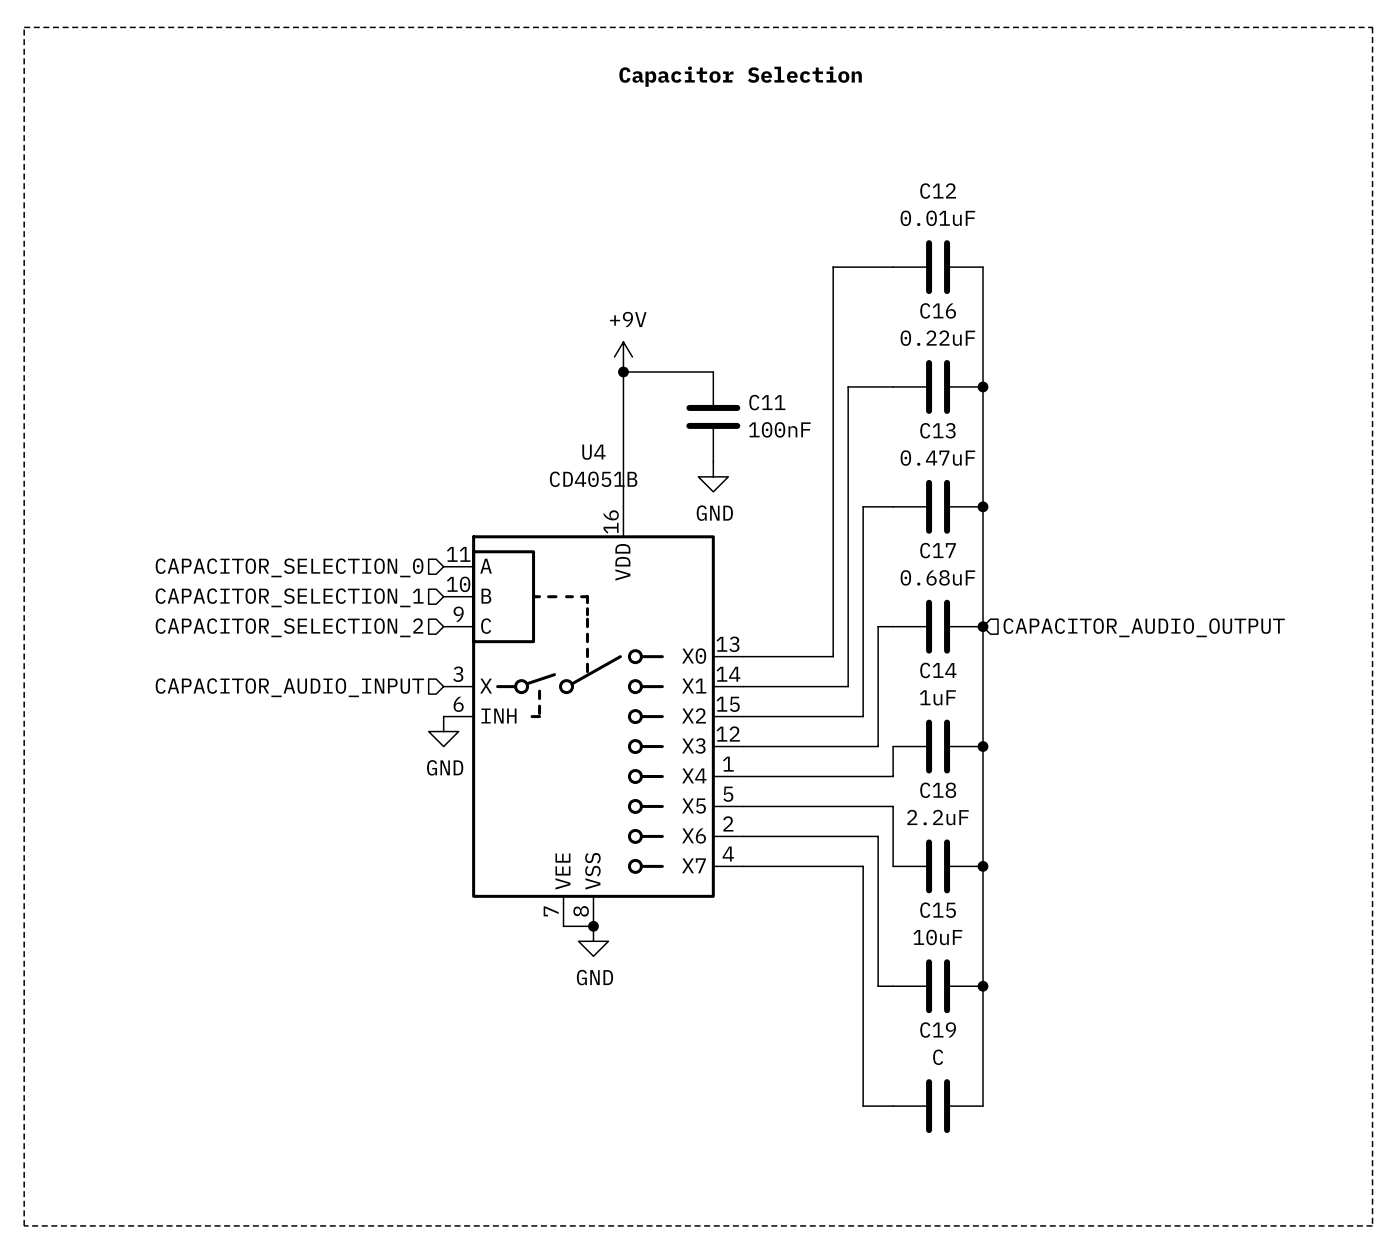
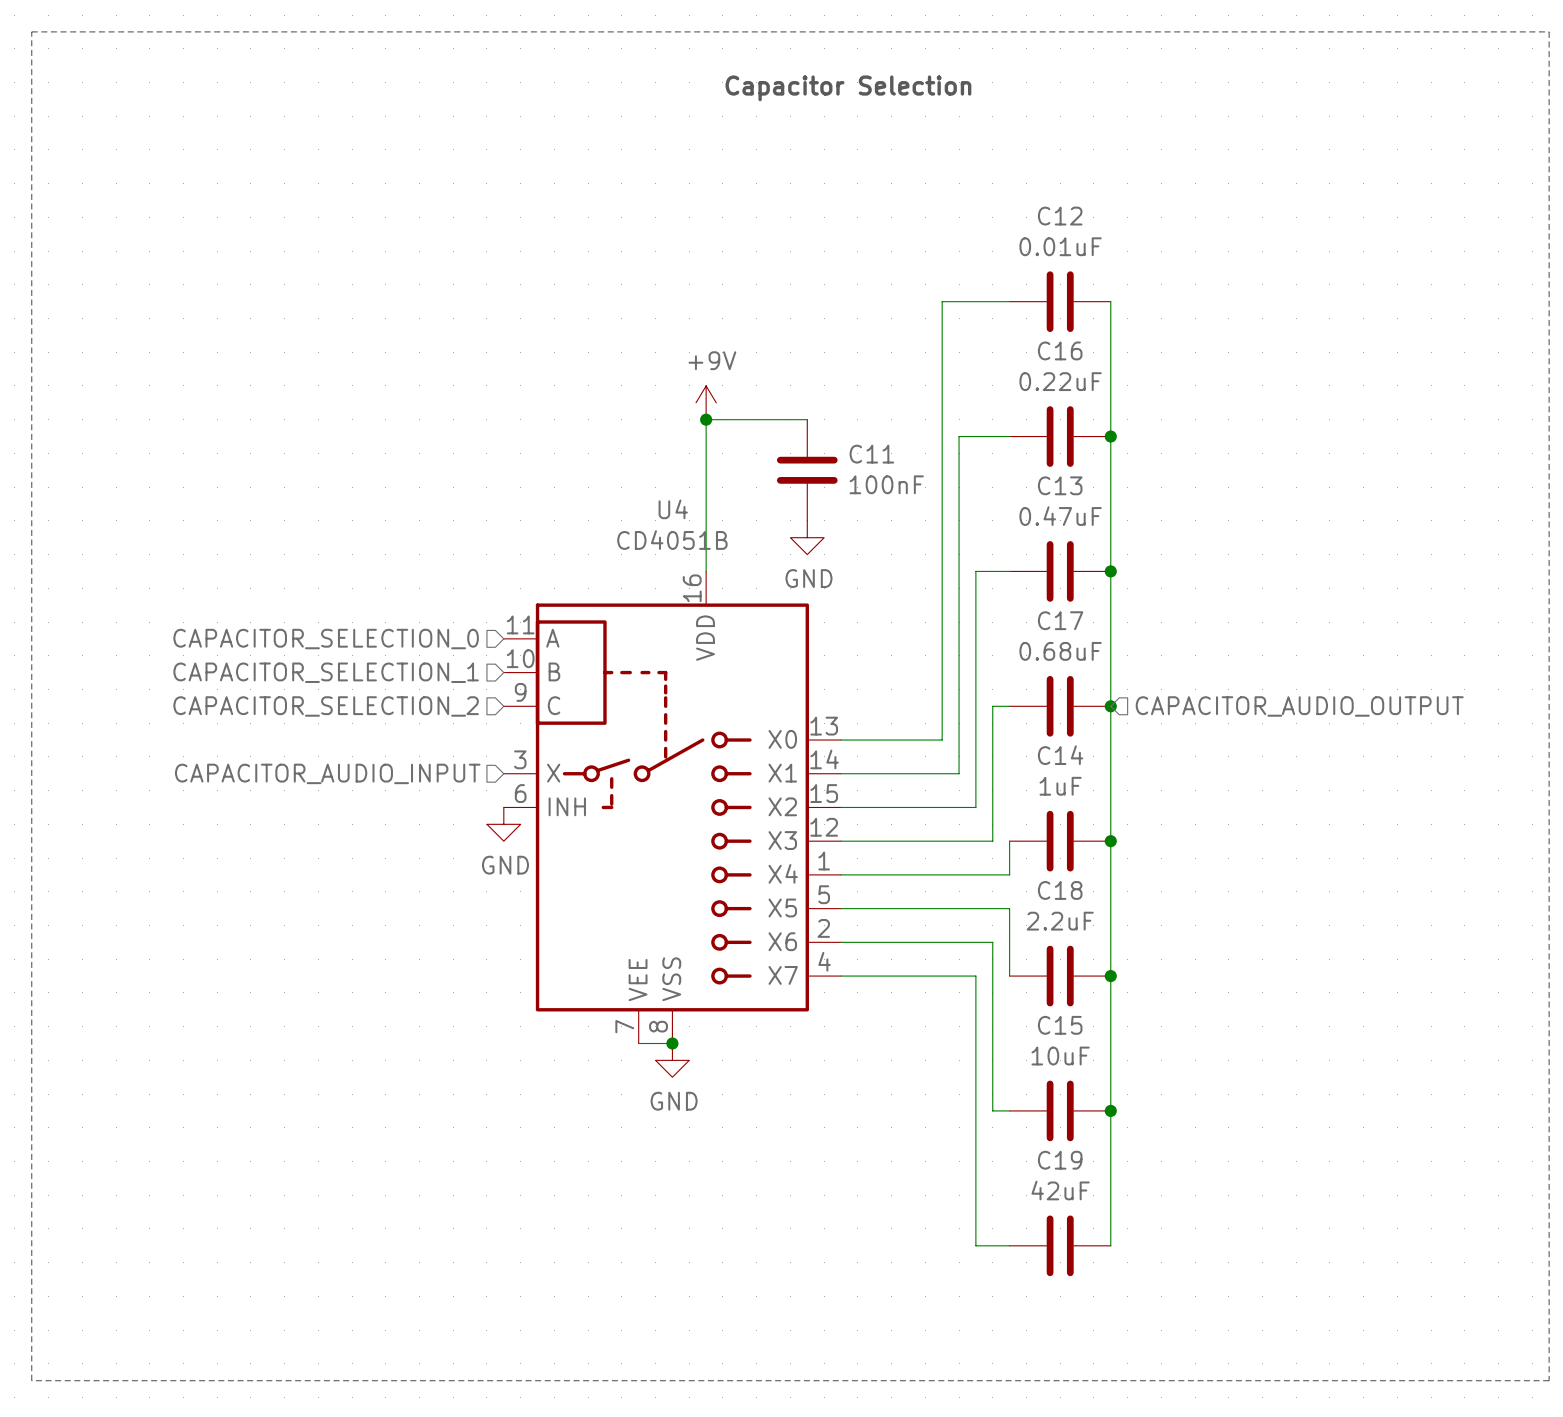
C19 value: C (938, 1057) -> 42uF (1060, 1190)

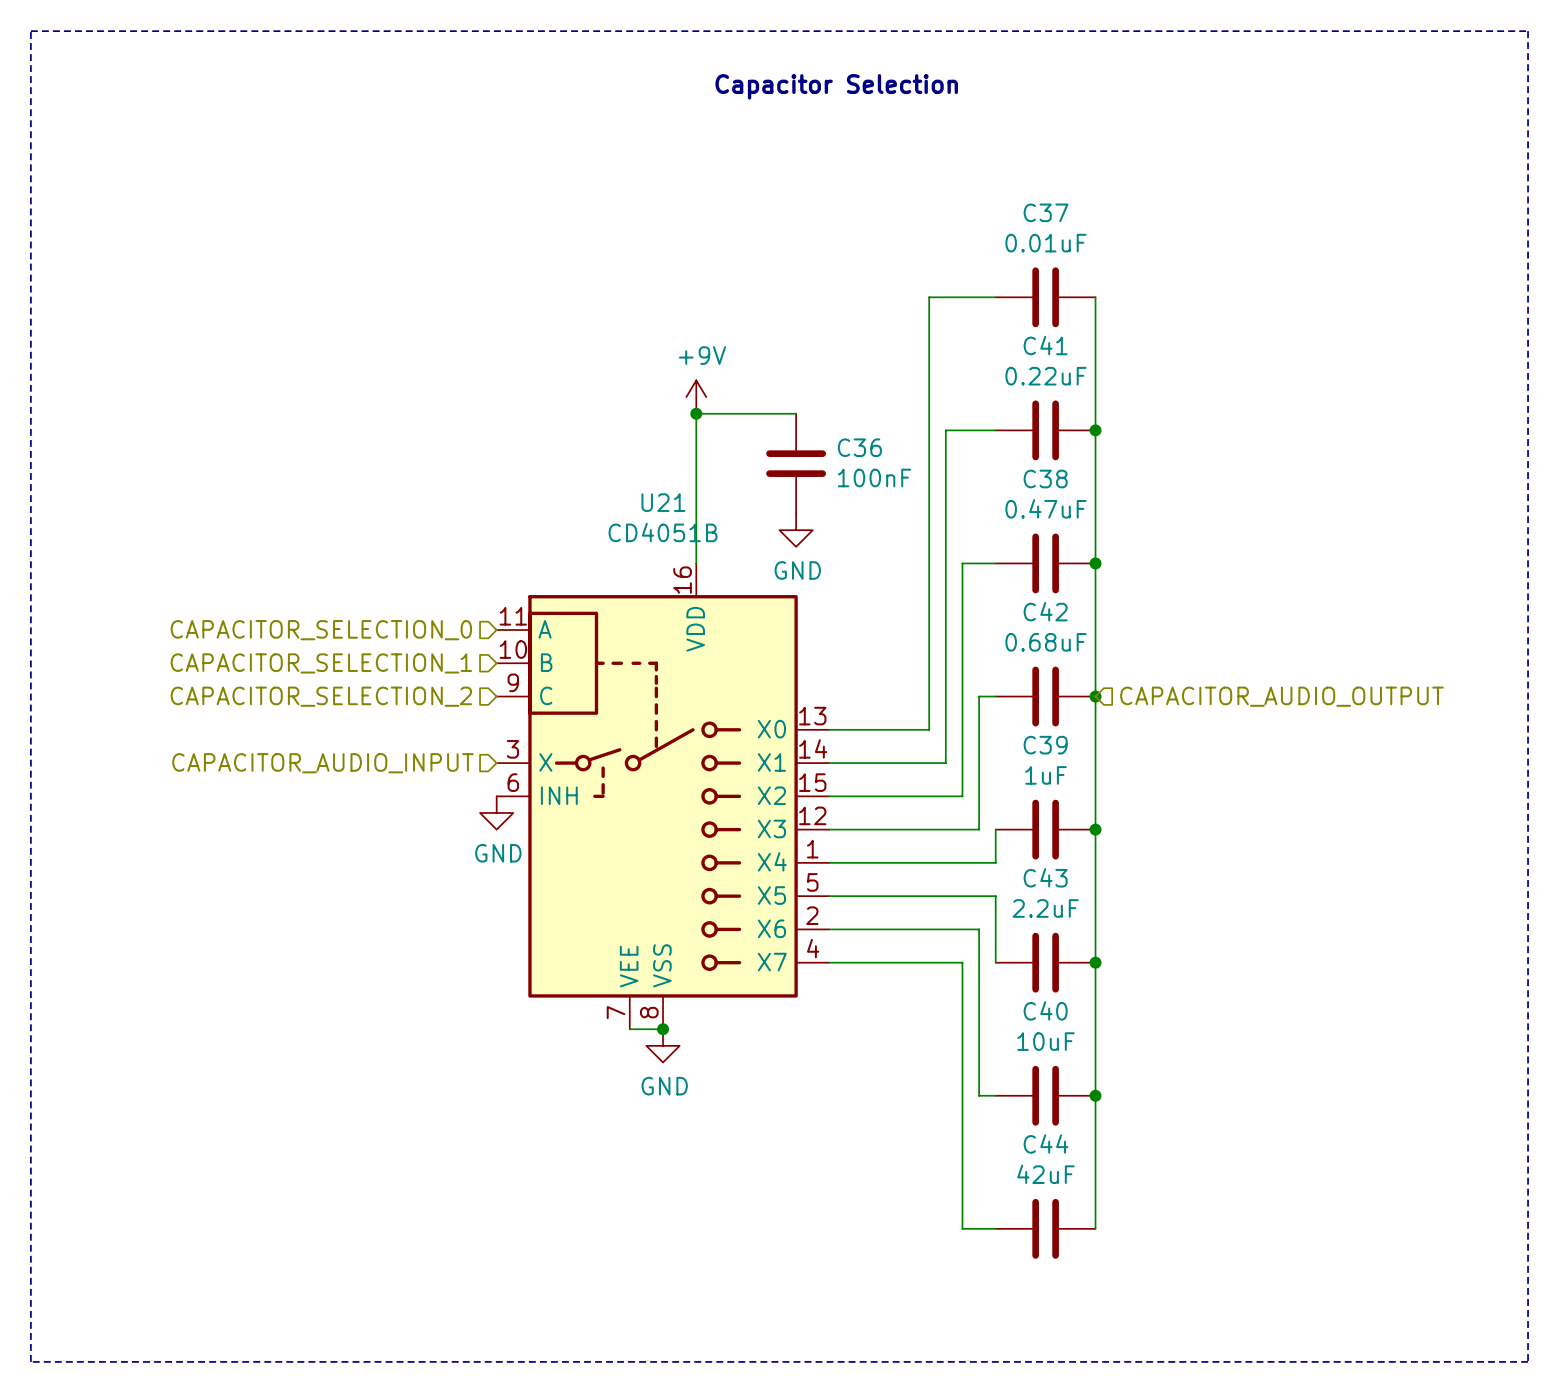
C12 name: C12 (1060, 216) -> C37 (1046, 212)
C16 name: C16 (1060, 350) -> C41 (1045, 345)
C11 name: C11 (871, 454) -> C36 (859, 447)
C13 name: C13 (1060, 485) -> C38 (1045, 479)
U4 name: U4 (673, 509) -> U21 (663, 502)
C17 name: C17 (1060, 620) -> C42 (1045, 611)
C14 name: C14 (1060, 755) -> C39 (1045, 745)
C18 name: C18 (1060, 890) -> C43 (1045, 877)
C15 name: C15 (1060, 1025) -> C40 (1045, 1010)
C19 name: C19 (1060, 1160) -> C44 (1046, 1143)

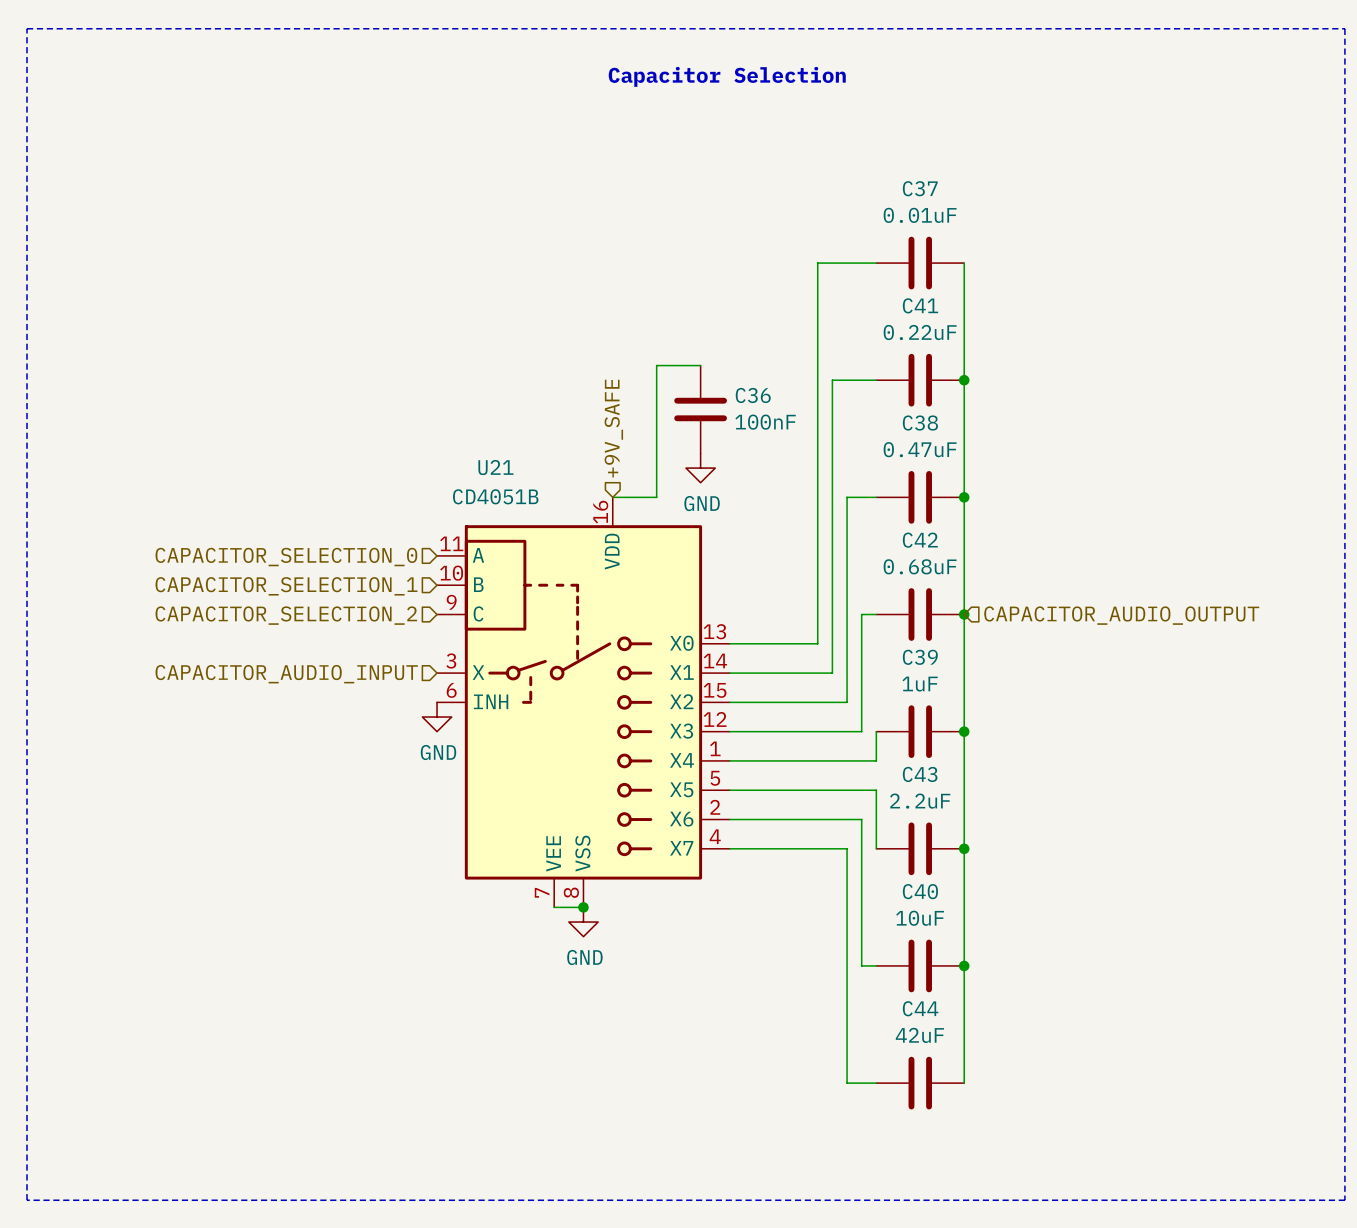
power symbol: +9V (696, 397) -> none
junction: (696, 413) -> none
wire: (746, 413) (696, 413) (696, 563) -> (656, 365) (656, 497) (612, 497)
hierarchical label: none -> +9V_SAFE (613, 428)
U21 name position: U21 (663, 502) -> U21 (495, 467)
U21 value position: CD4051B (663, 532) -> CD4051B (495, 496)

